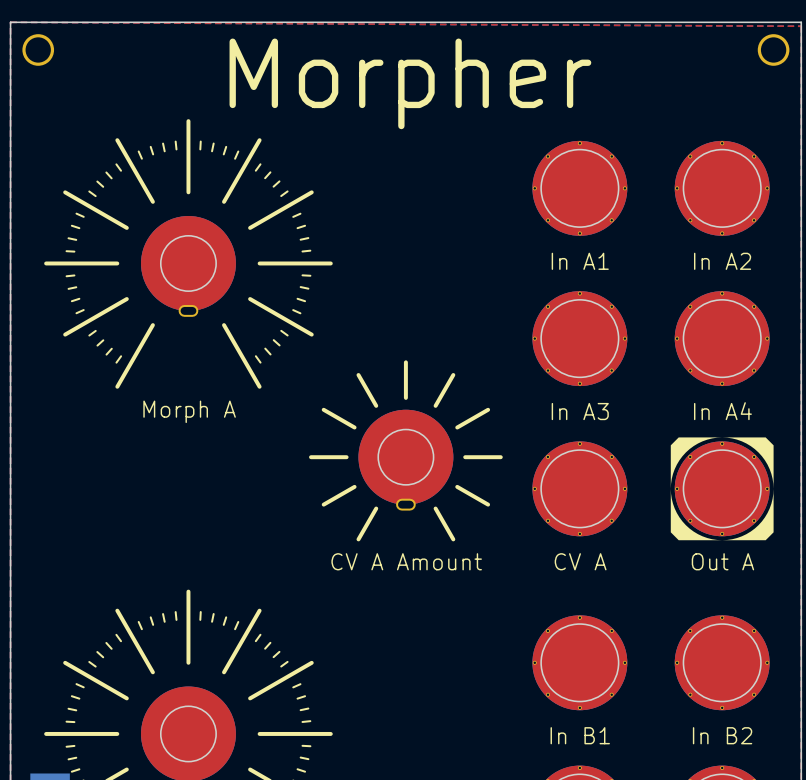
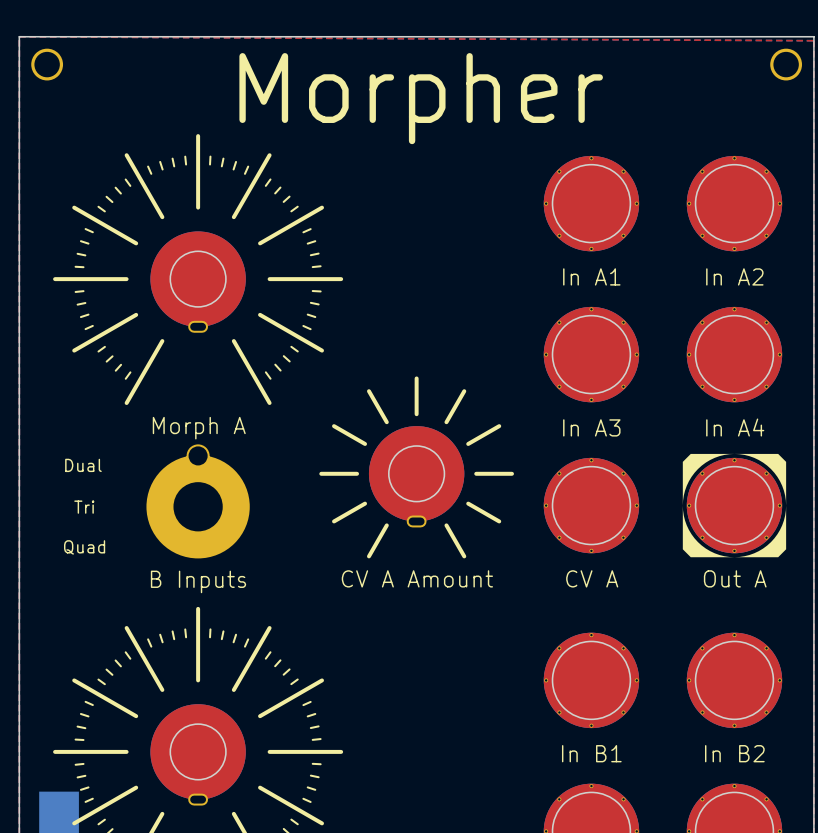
text: none -> Dual (83, 465)
part: none -> B Inputs (198, 501)
text: none -> Tri (84, 507)
text: none -> Quad (84, 547)

